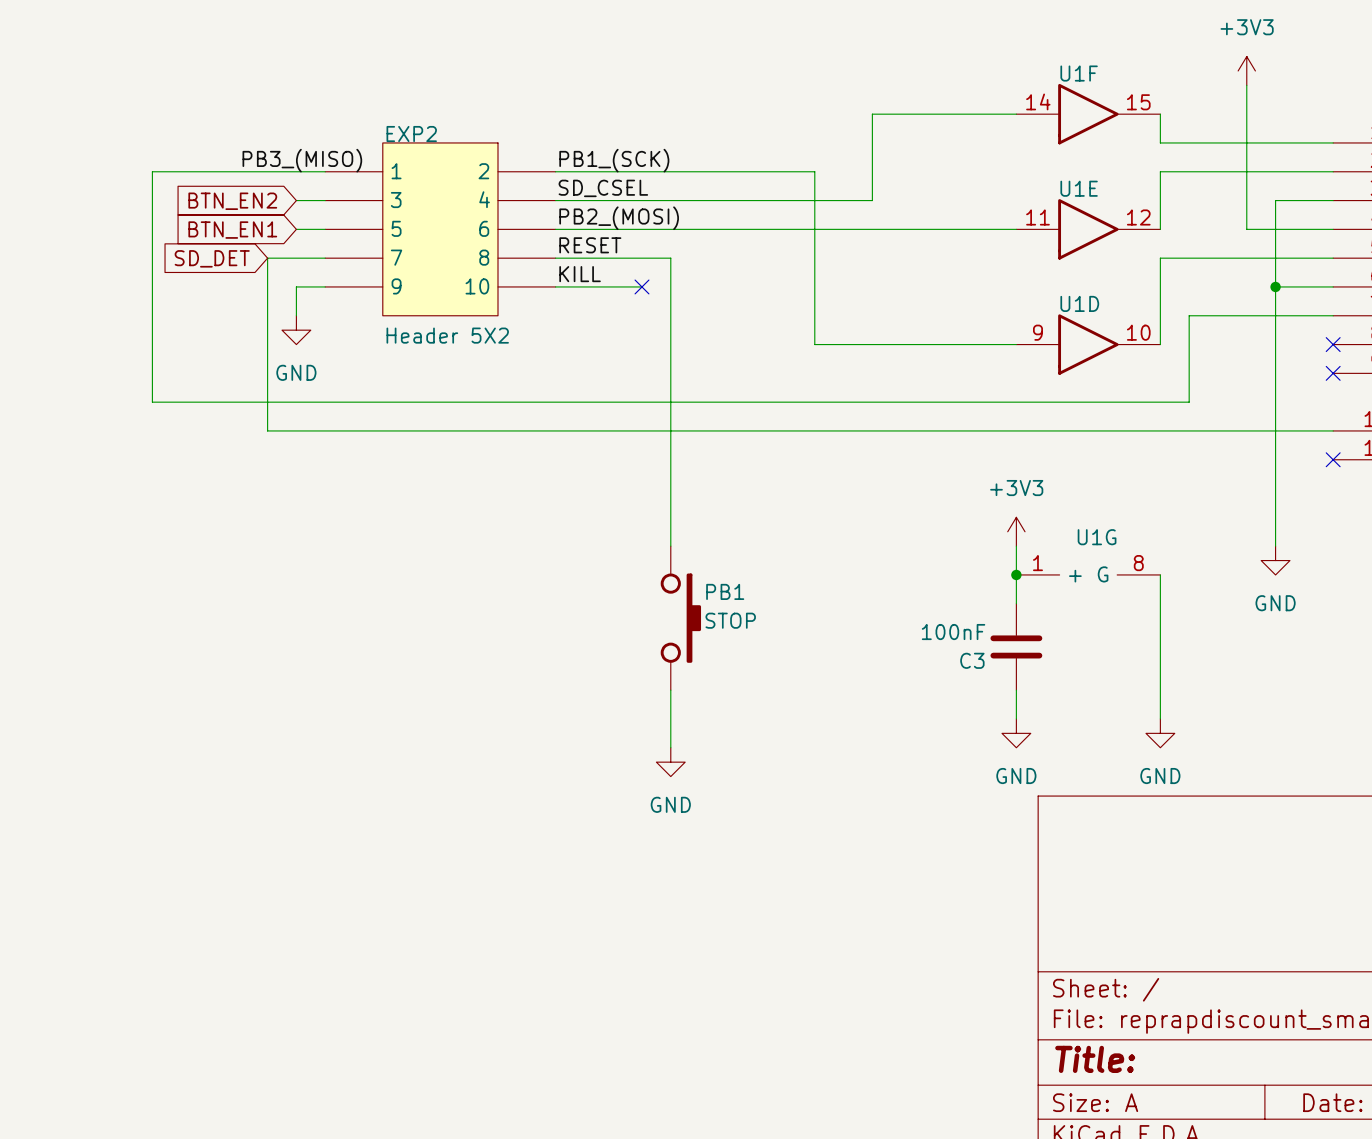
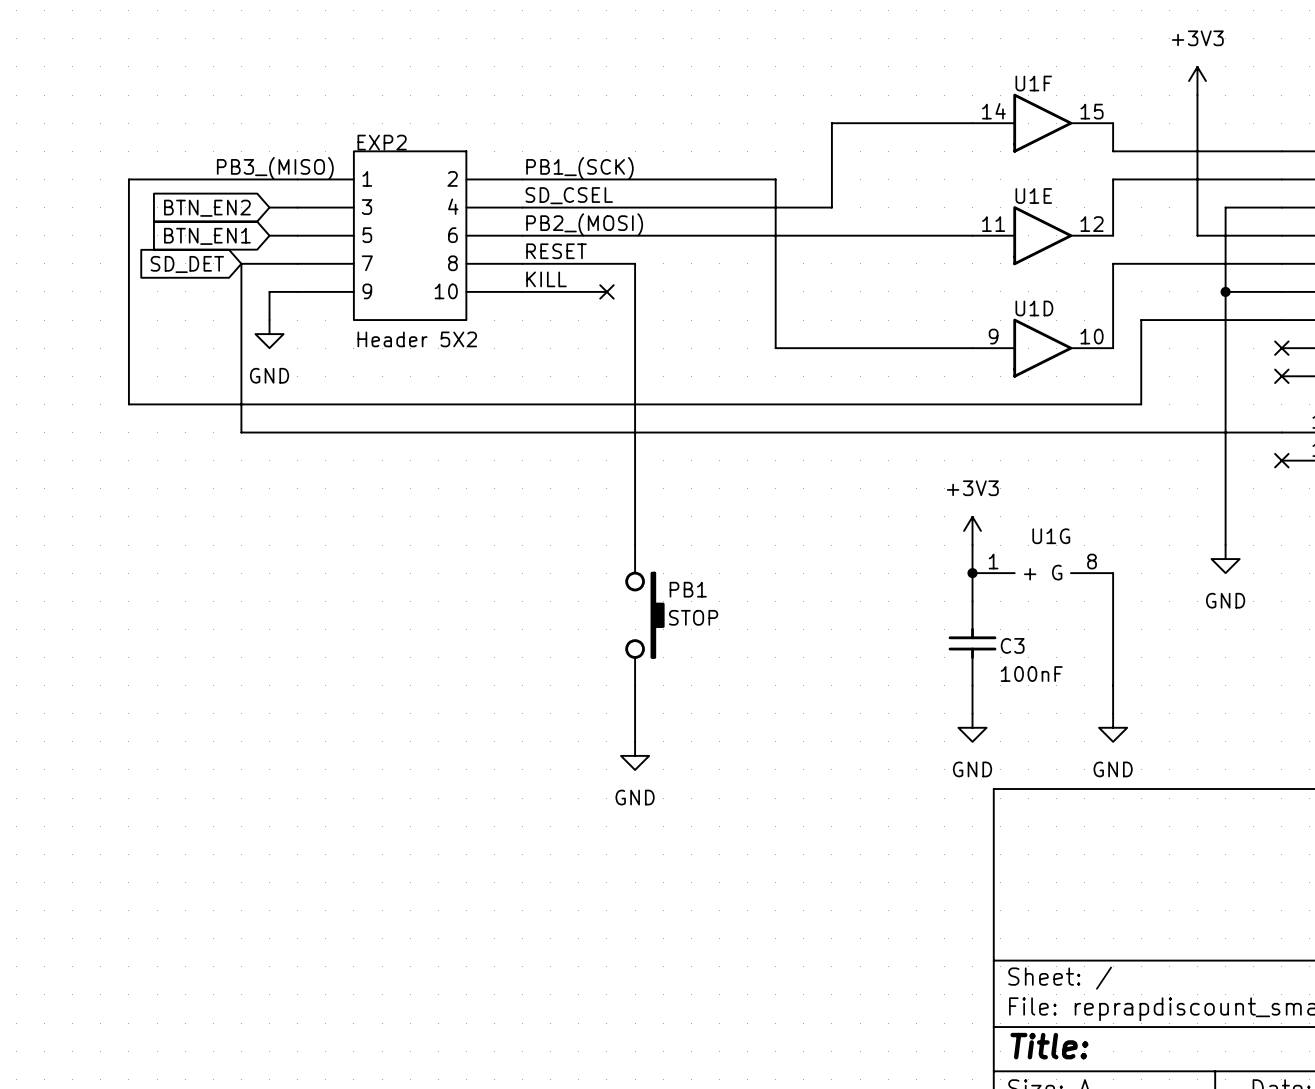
C3 symbol: [990, 603, 1043, 691] -> [948, 601, 997, 686]
C3 value position: 100nF (953, 632) -> 100nF (1031, 674)
C3 name position: C3 (972, 660) -> C3 (1012, 645)

